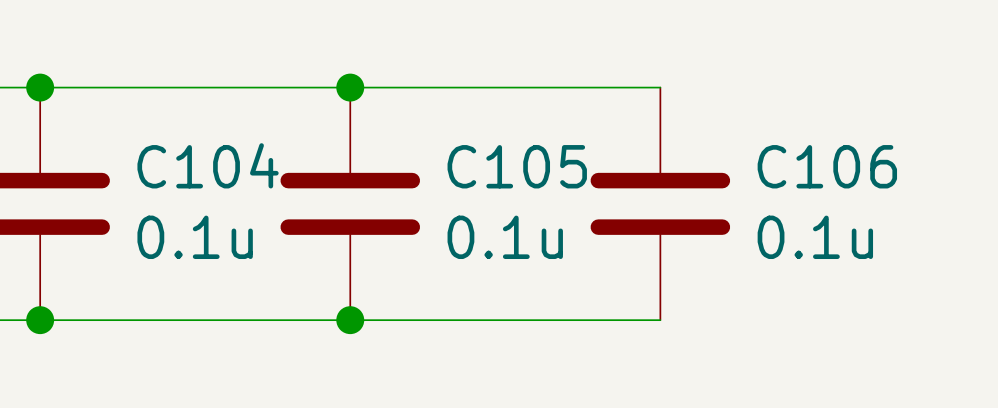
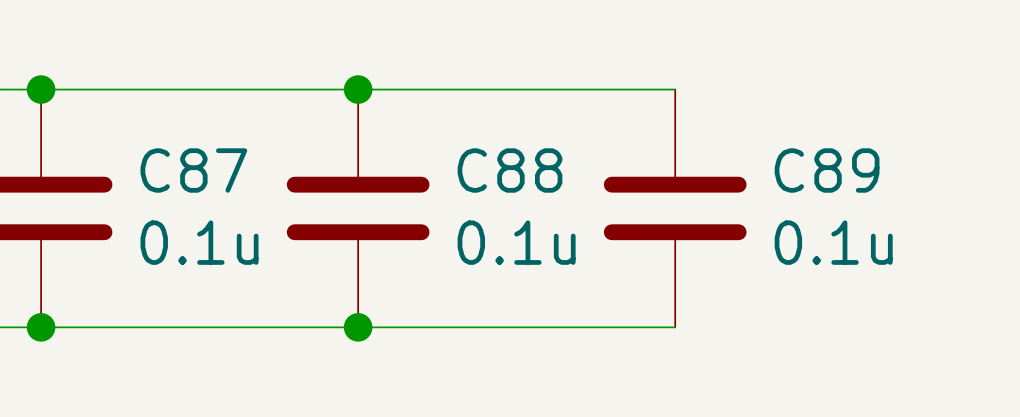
C104 name: C104 (208, 165) -> C87 (193, 170)
C105 name: C105 (517, 166) -> C88 (510, 170)
C106 name: C106 (827, 166) -> C89 (827, 170)

